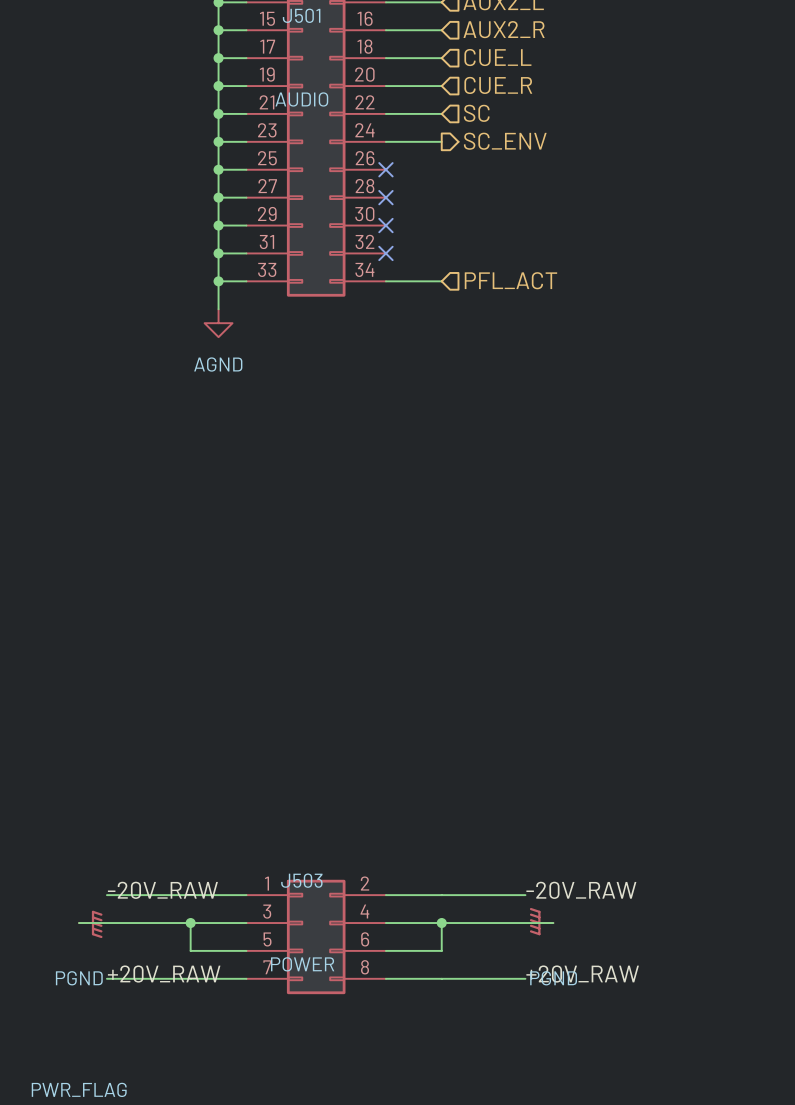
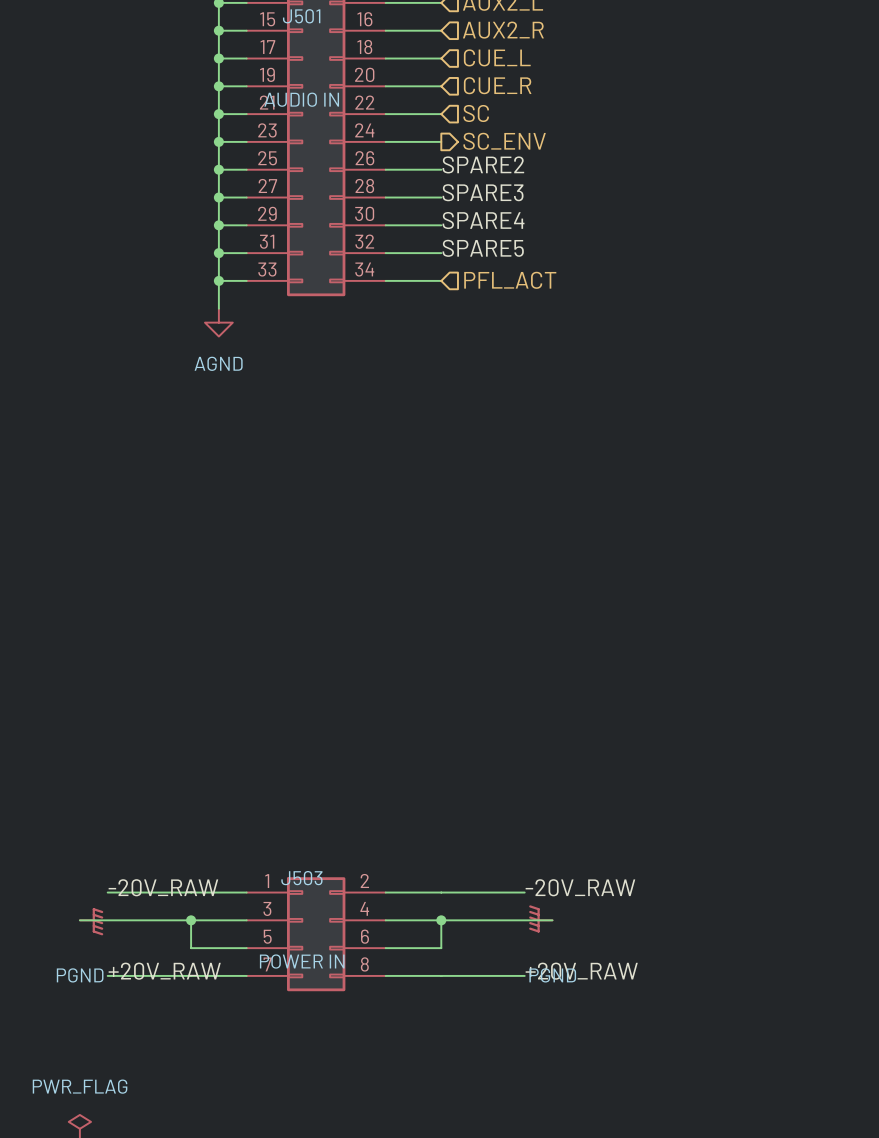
J501 value: AUDIO (301, 99) -> AUDIO IN (301, 99)
label: none -> SPARE2 (483, 164)
wire: none -> (385, 169) (441, 169)
no-connect mark: (385, 169) -> none
label: none -> SPARE3 (483, 192)
wire: none -> (385, 197) (441, 197)
no-connect mark: (385, 197) -> none
label: none -> SPARE4 (483, 220)
wire: none -> (385, 225) (441, 225)
no-connect mark: (385, 225) -> none
label: none -> SPARE5 (483, 248)
wire: none -> (385, 253) (441, 253)
no-connect mark: (385, 253) -> none
J503 value: POWER (302, 964) -> POWER IN (302, 961)

